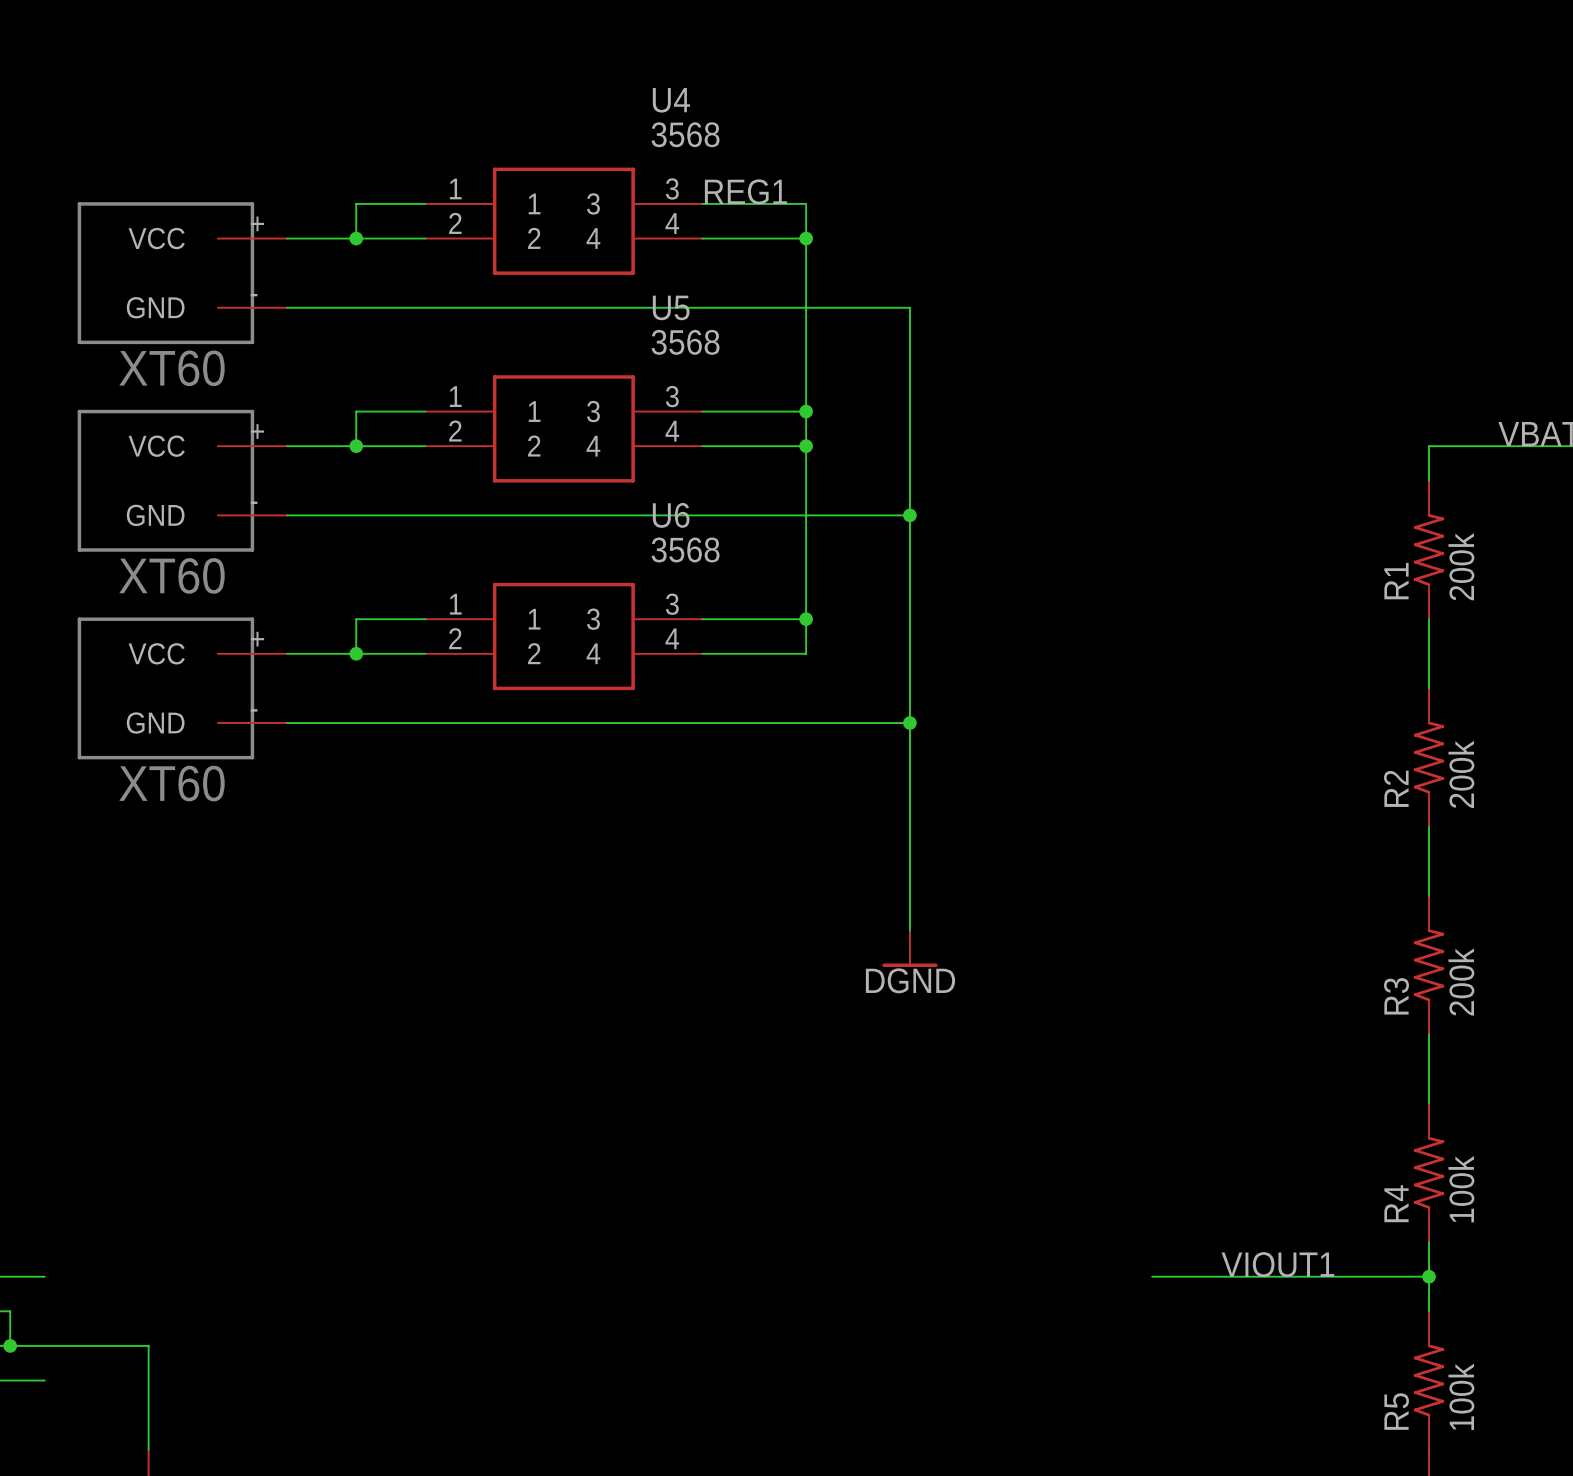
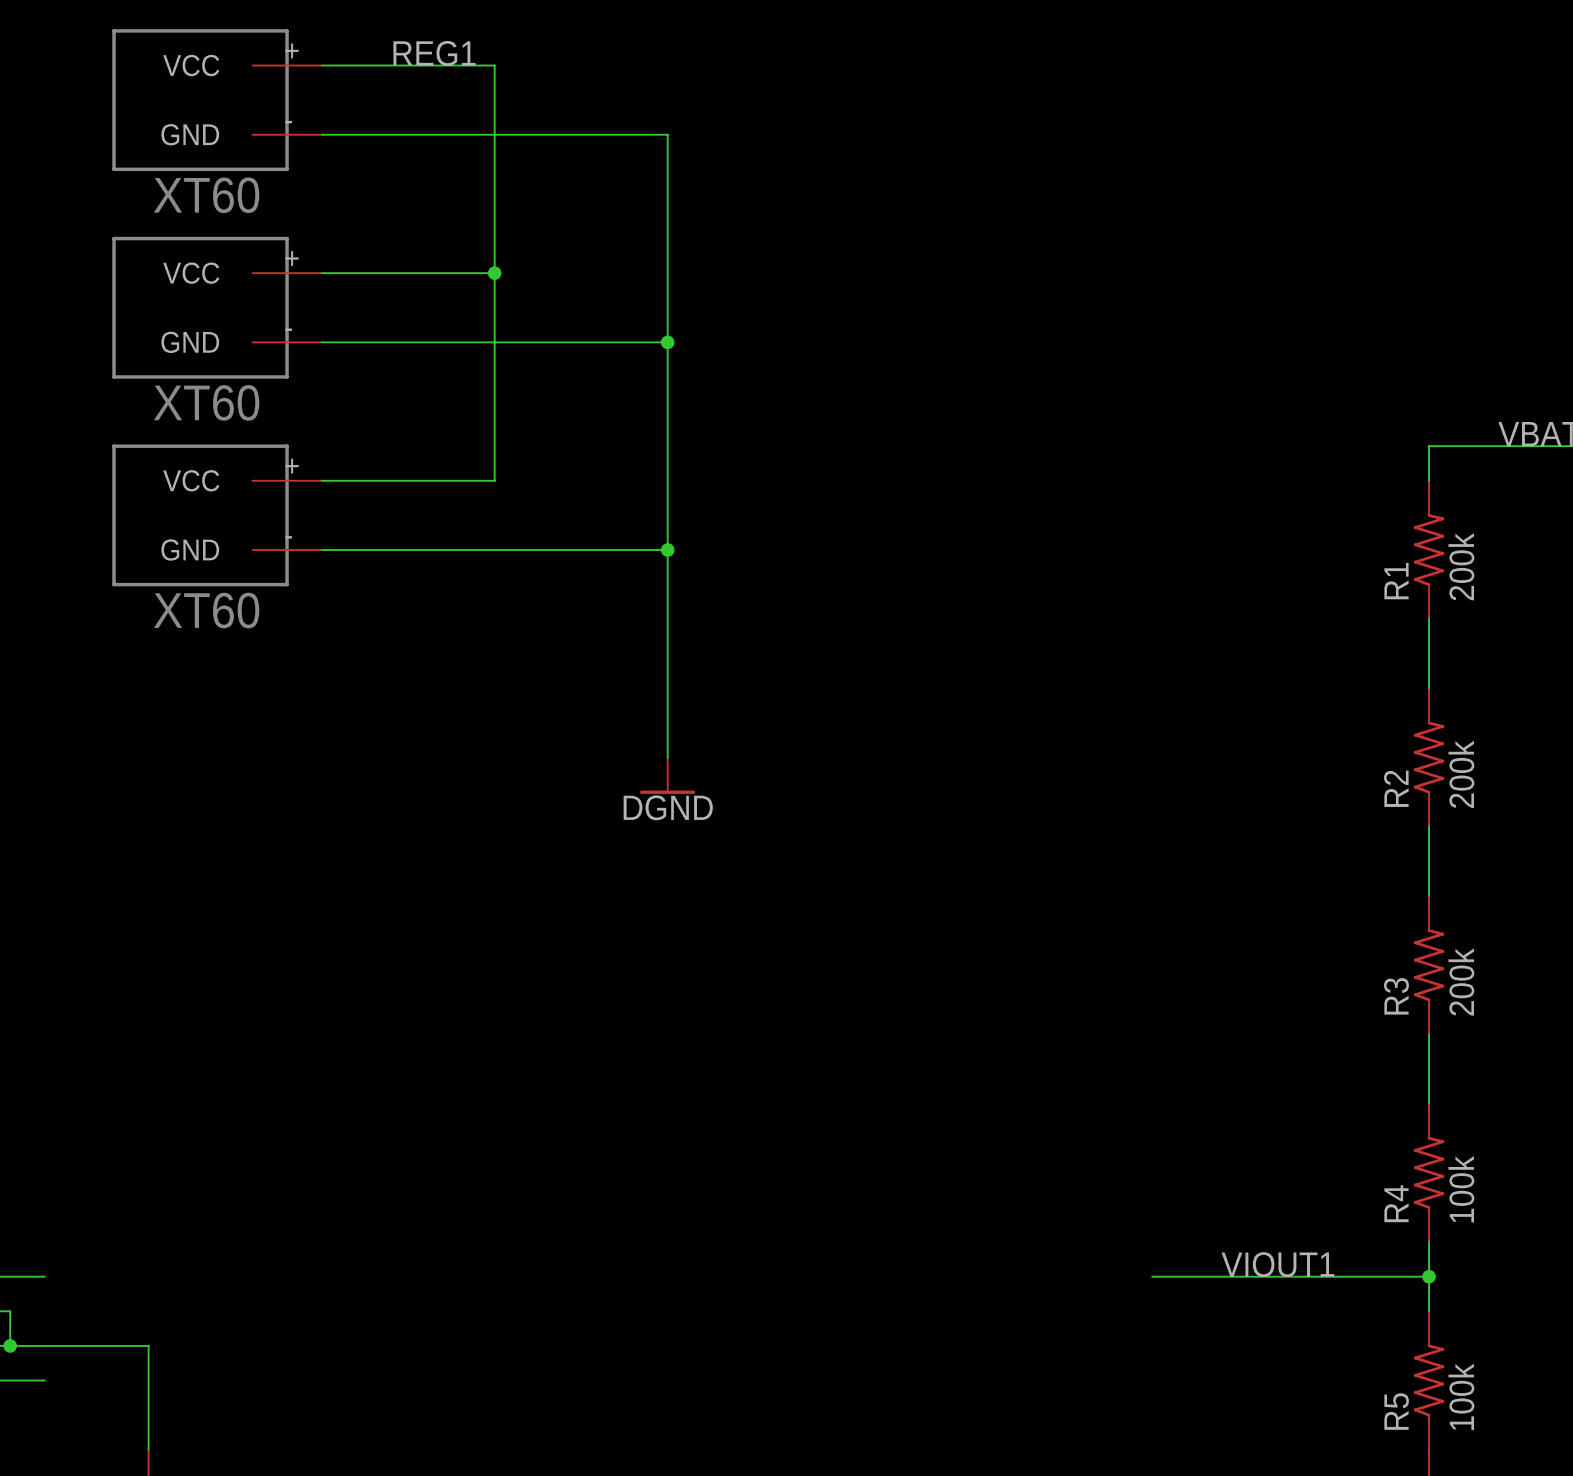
label: none -> REG1 (434, 53)
wire: none -> (321, 65) (494, 65) (494, 480) (321, 480)
part: none -> (216, 100)
wire: none -> (321, 134) (667, 134) (667, 757)
label: REG1 (745, 191) -> none
wire: (425, 203) (356, 203) (356, 238) -> none
wire: (702, 203) (806, 203) (806, 653) (702, 653) -> none
U4: 3568 (563, 221) -> none
wire: (287, 238) (425, 238) -> none
junction: (356, 238) -> none
wire: (702, 238) (806, 238) -> none
junction: (806, 238) -> none
part position: (182, 273) -> (216, 307)
wire: none -> (321, 273) (494, 273)
junction: none -> (494, 273)
wire: (287, 307) (909, 307) (909, 930) -> none
wire: none -> (321, 342) (667, 342)
junction: none -> (667, 342)
wire: (425, 411) (356, 411) (356, 446) -> none
wire: (702, 411) (806, 411) -> none
junction: (806, 411) -> none
U5: 3568 (563, 428) -> none
wire: (287, 446) (425, 446) -> none
junction: (356, 446) -> none
wire: (702, 446) (806, 446) -> none
junction: (806, 446) -> none
part position: (182, 480) -> (216, 515)
wire: (287, 515) (909, 515) -> none
junction: (909, 515) -> none
wire: none -> (321, 549) (667, 549)
junction: none -> (667, 549)
wire: (425, 619) (356, 619) (356, 653) -> none
wire: (702, 619) (806, 619) -> none
junction: (806, 619) -> none
U6: 3568 (563, 636) -> none
wire: (287, 653) (425, 653) -> none
junction: (356, 653) -> none
part: (182, 688) -> none
wire: (287, 723) (909, 723) -> none
junction: (909, 723) -> none
power symbol position: DGND (909, 948) -> DGND (667, 775)

